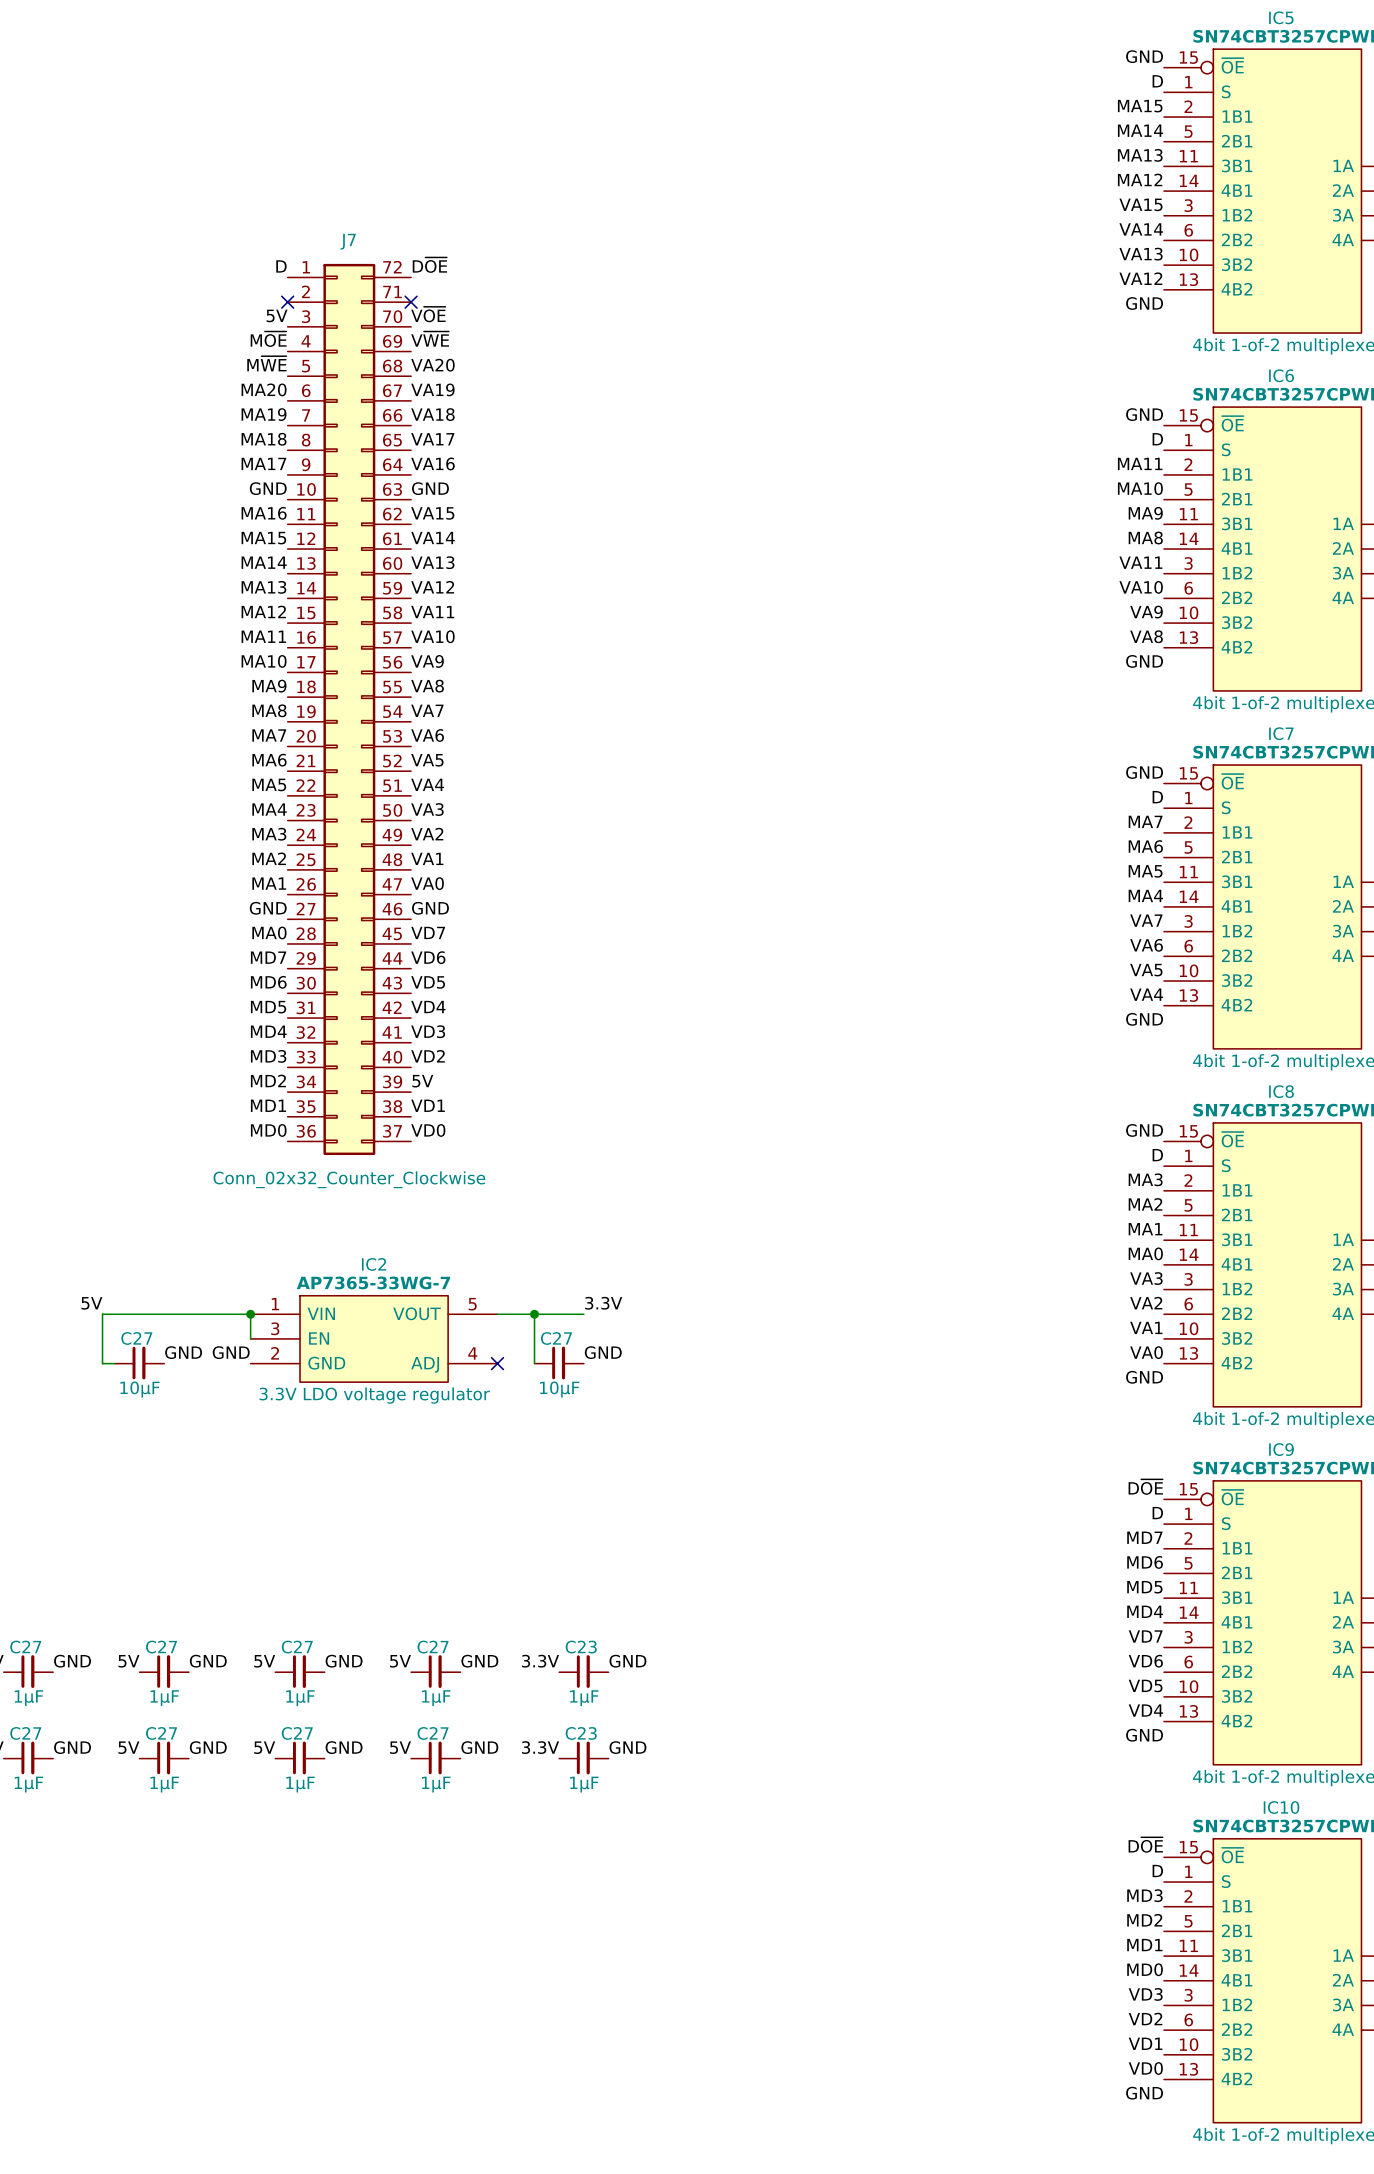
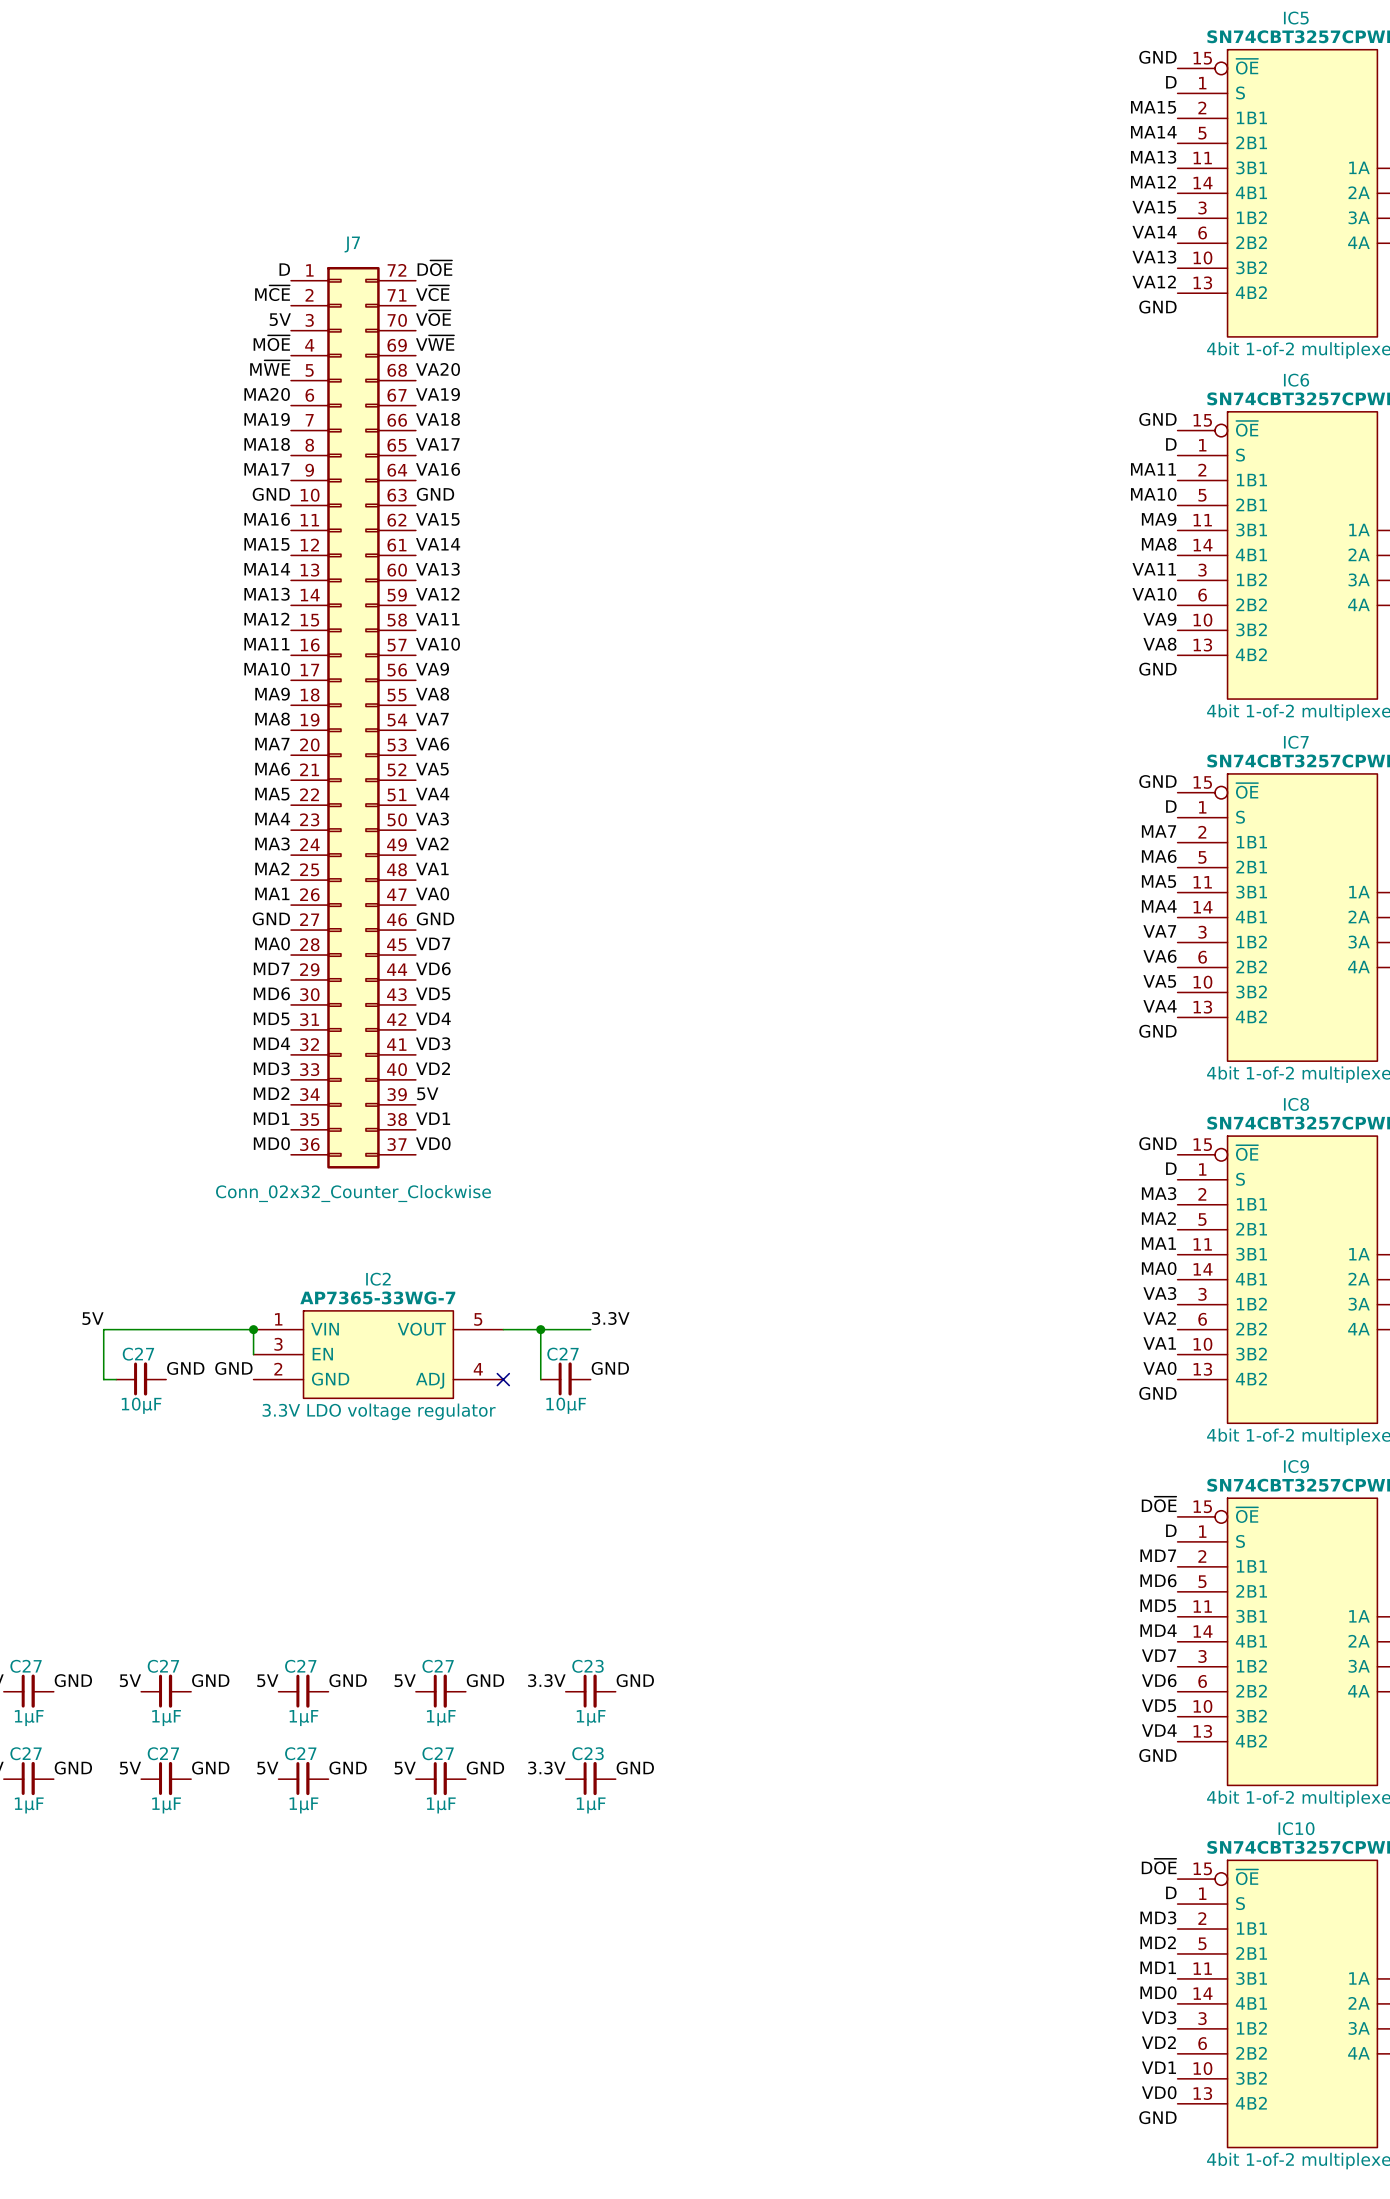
label: none -> M~{CE} (272, 293)
label: none -> V~{CE} (432, 293)
no-connect mark: (287, 302) -> none
no-connect mark: (411, 302) -> none

